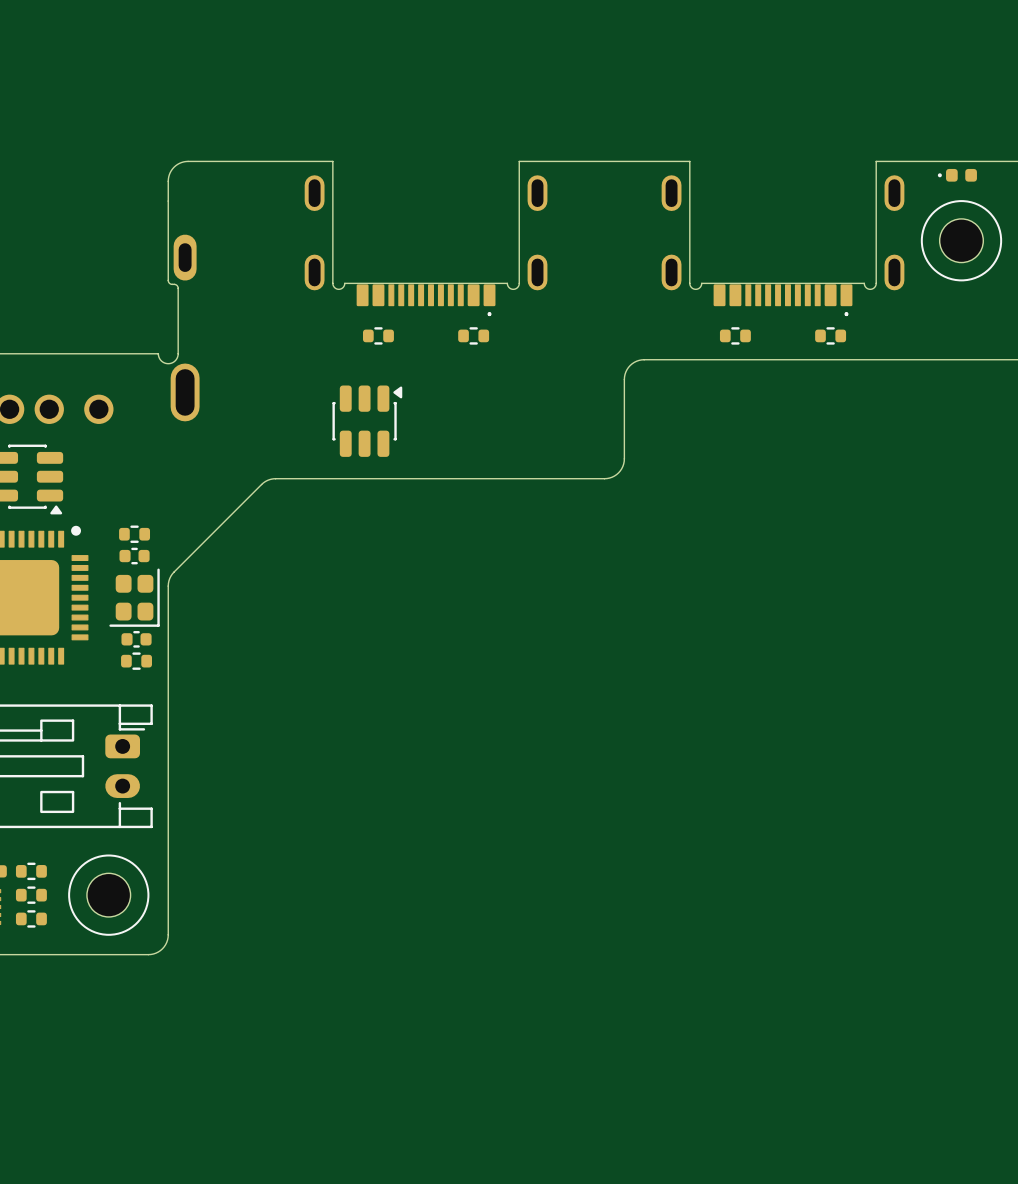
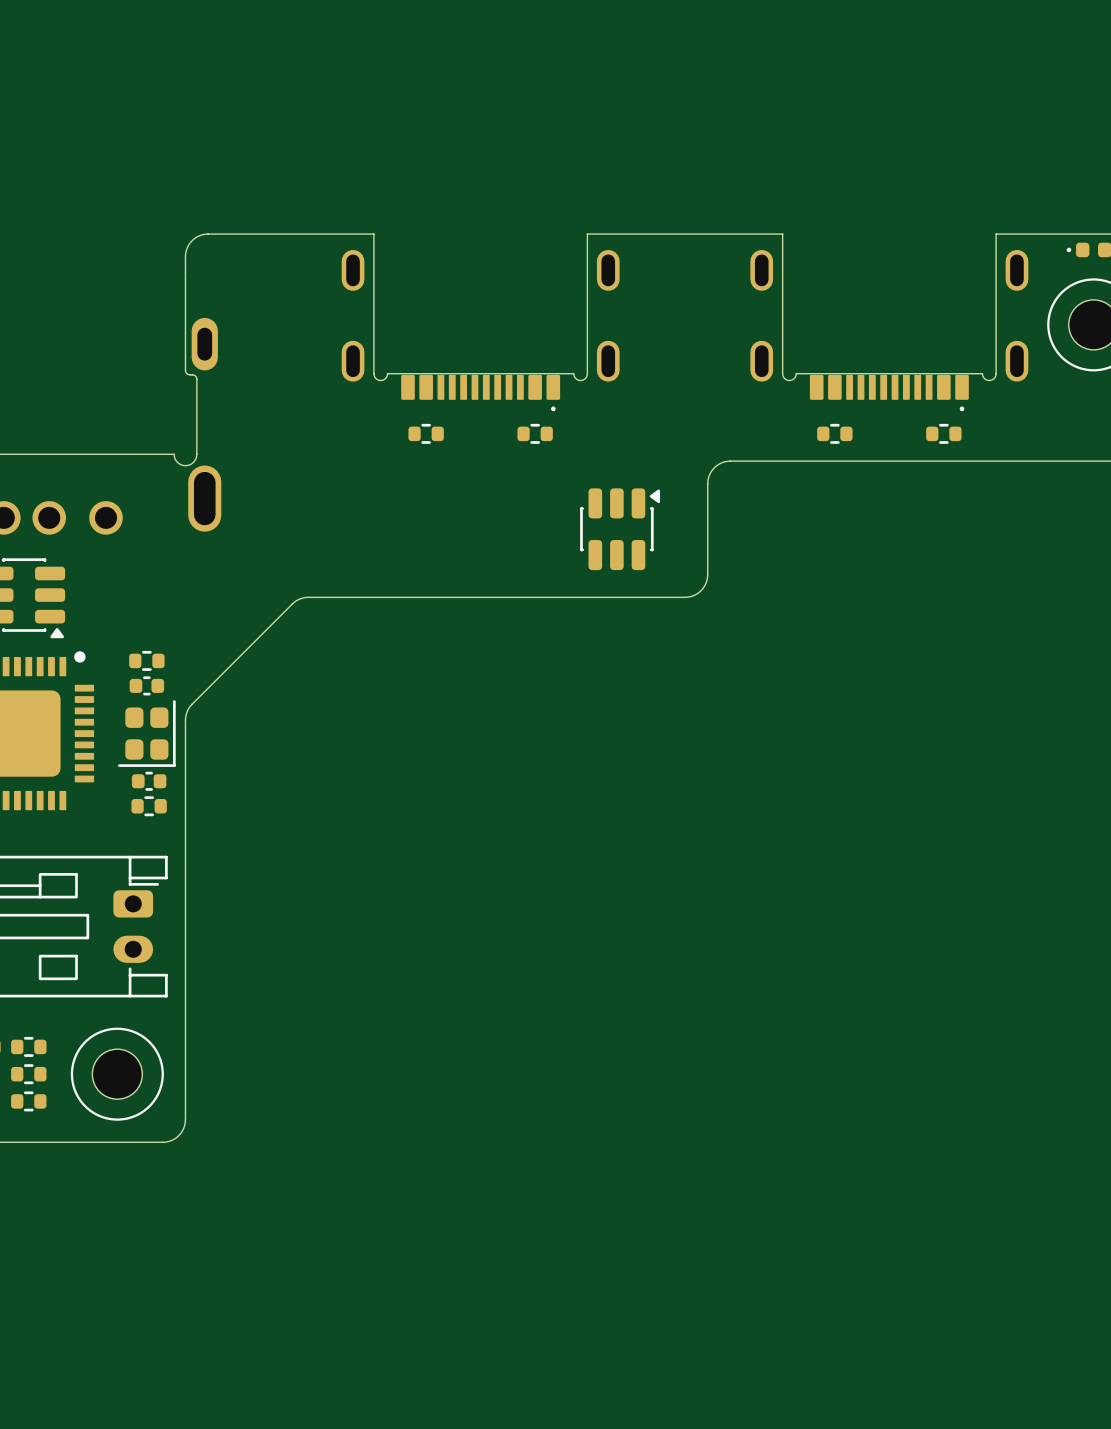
part position: (367, 421) -> (620, 529)

